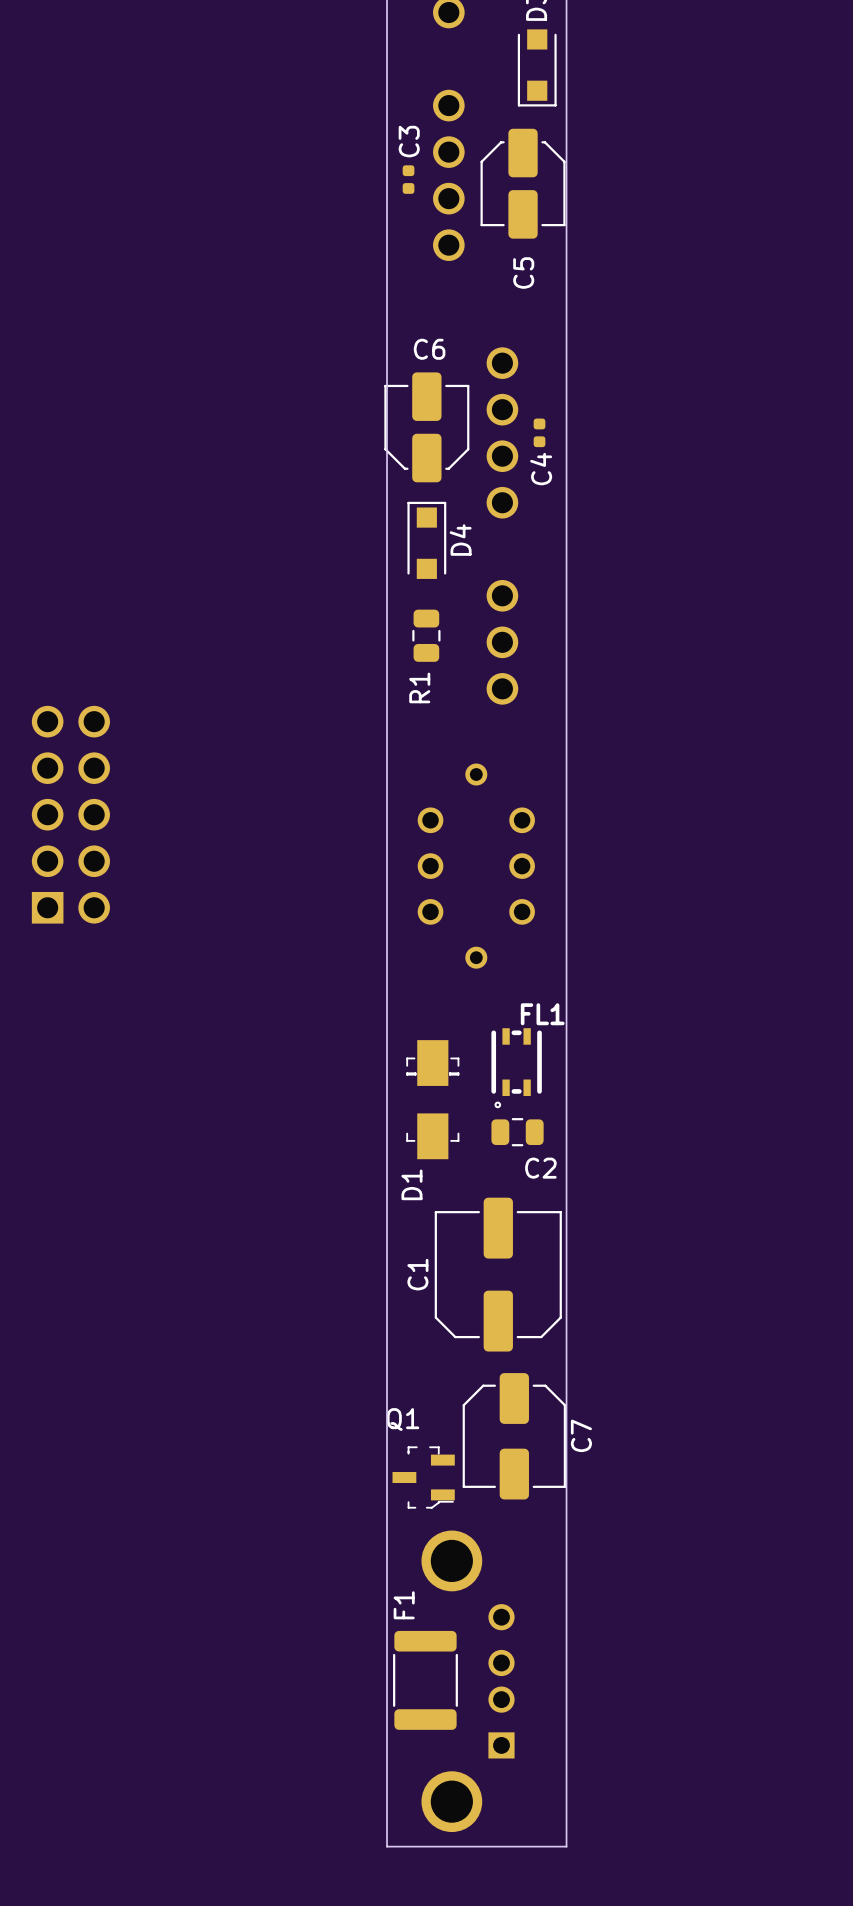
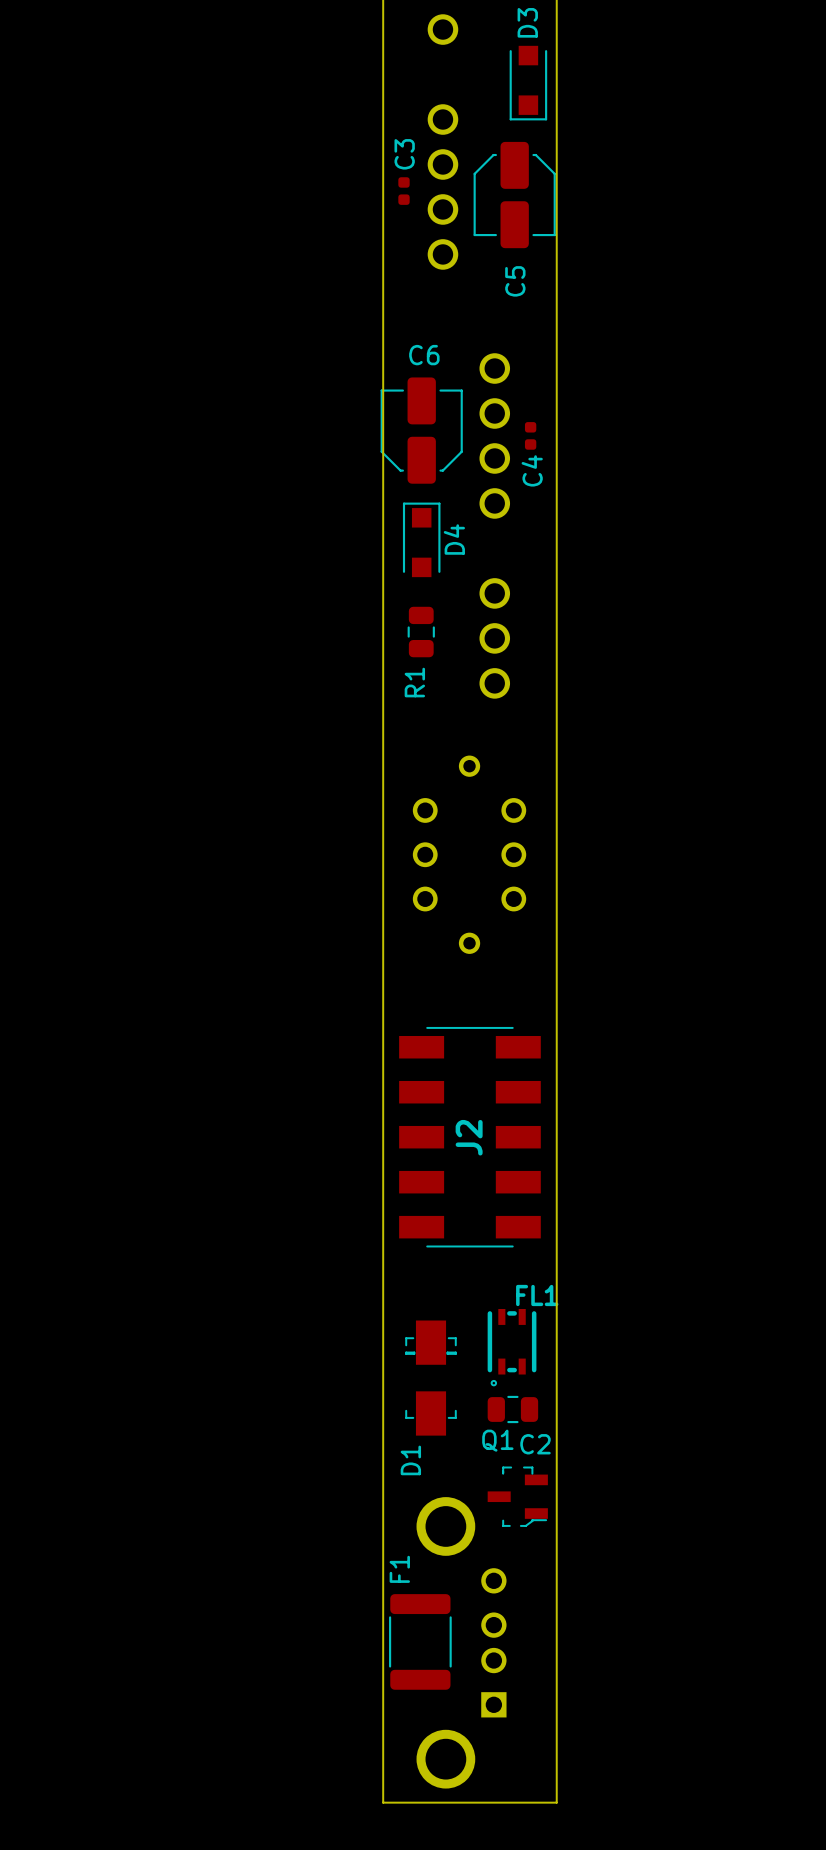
part: (70, 814) -> none
FL1 position: (516, 1068) -> (512, 1347)
D1 position: (432, 1099) -> (430, 1378)
C2 position: (517, 1132) -> (512, 1409)
J2: none -> (469, 1137)
C1: (498, 1274) -> none
C7: (514, 1436) -> none
Q1 position: (423, 1477) -> (517, 1496)

